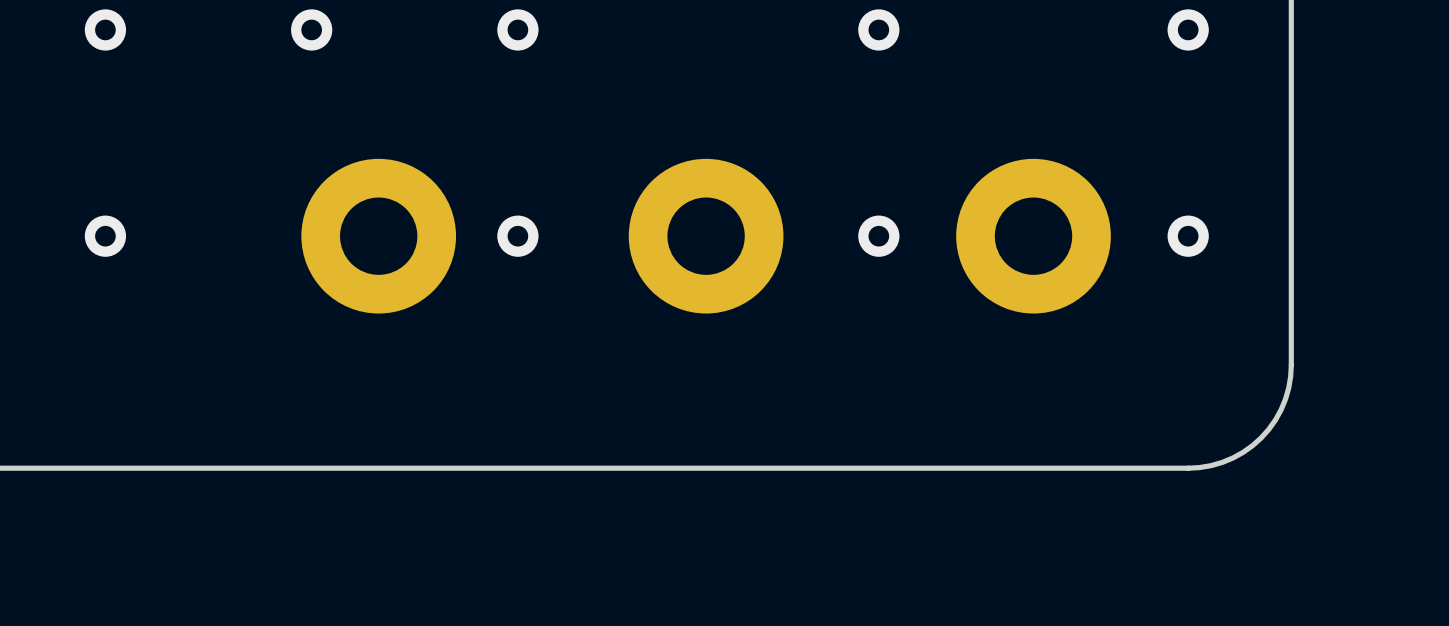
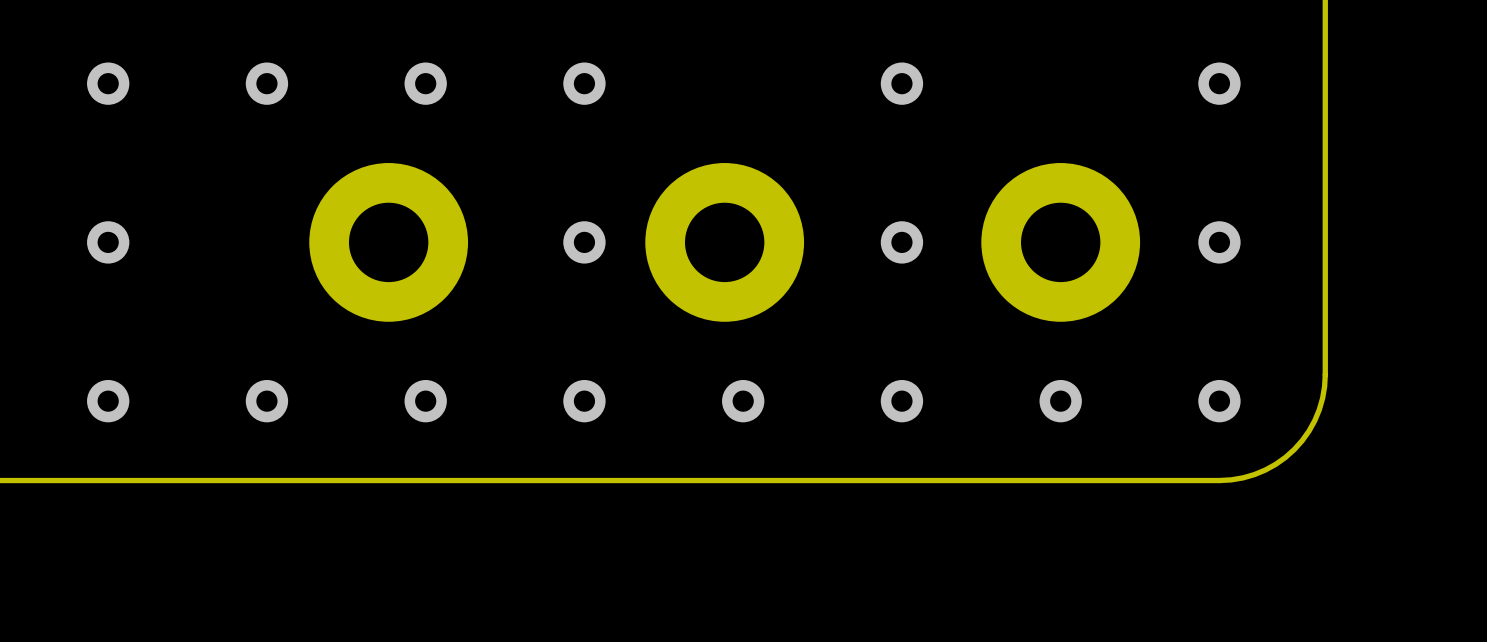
via position: (105, 29) -> (108, 83)
via: (311, 29) -> none
via: (517, 29) -> none
via position: (878, 29) -> (901, 83)
via position: (1188, 29) -> (1219, 83)
via: none -> (266, 83)
via: none -> (425, 83)
via: none -> (584, 83)
via position: (517, 236) -> (584, 242)
via: none -> (108, 401)
via: none -> (266, 401)
via: none -> (425, 401)
via: none -> (584, 401)
via: none -> (743, 401)
via: none -> (901, 401)
via: none -> (1060, 401)
via: none -> (1219, 401)

